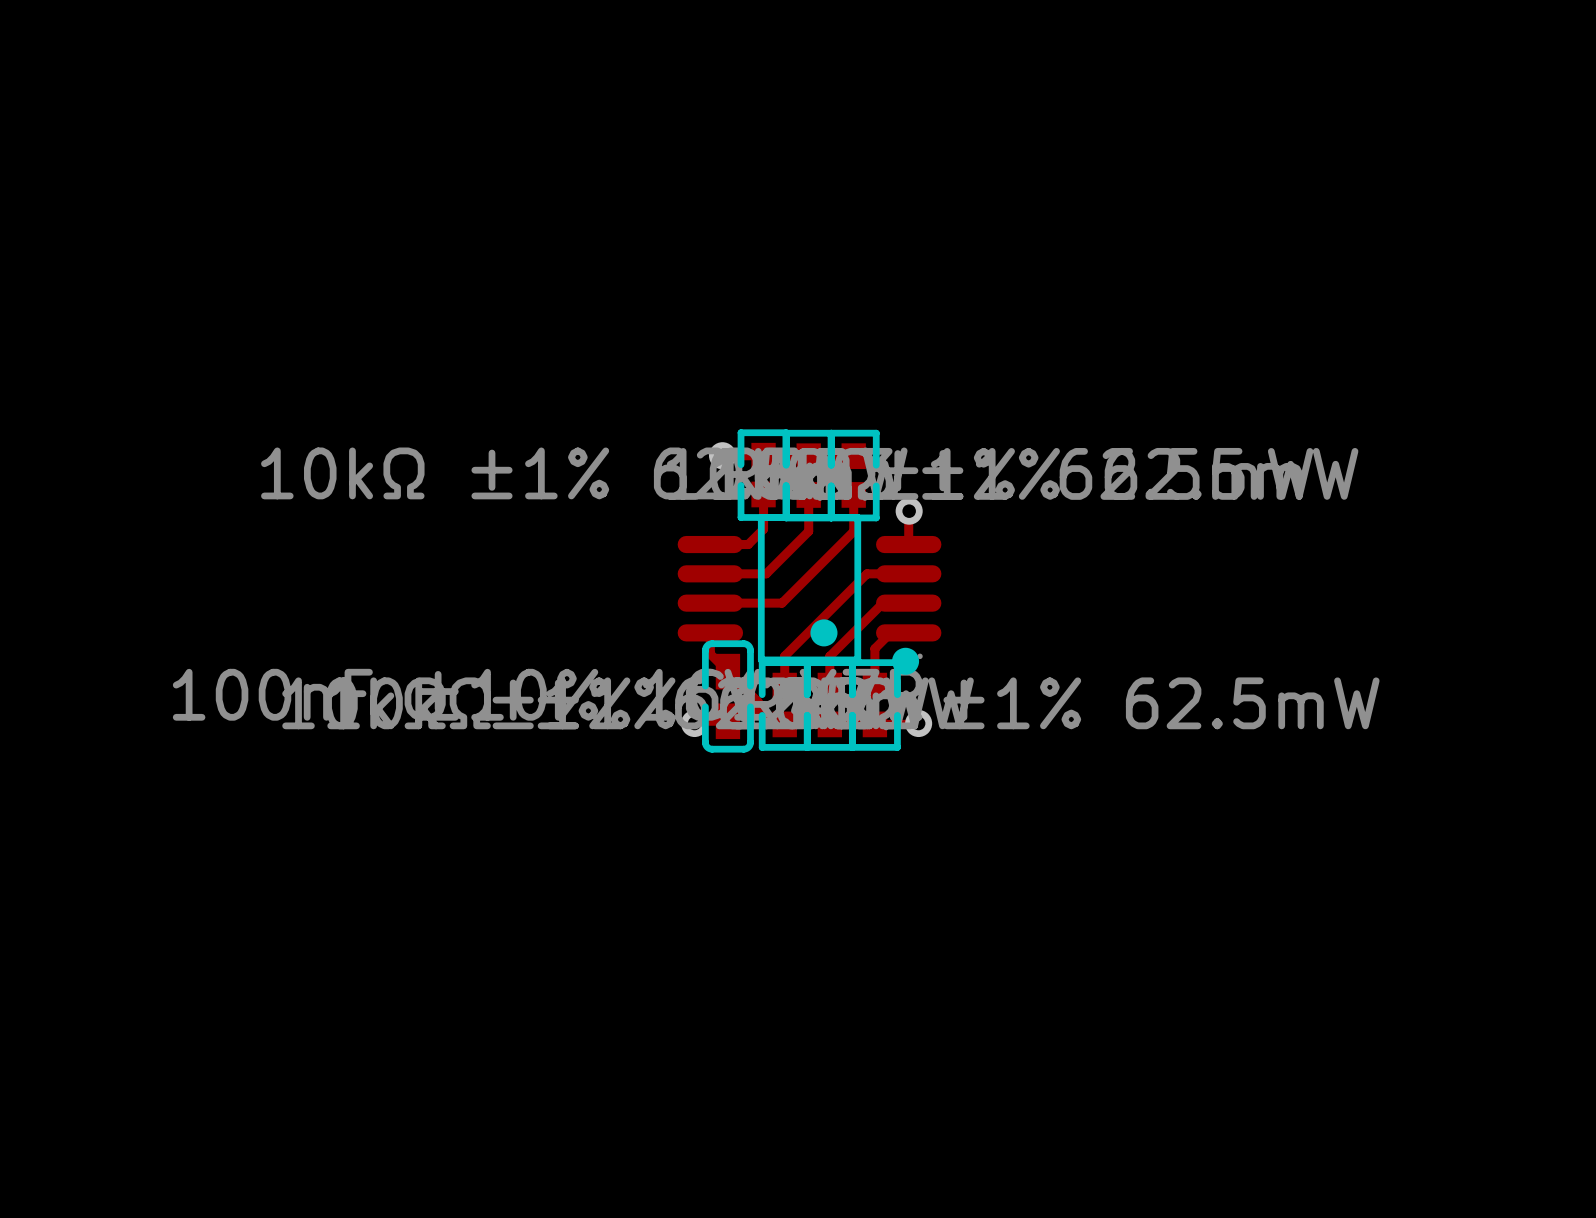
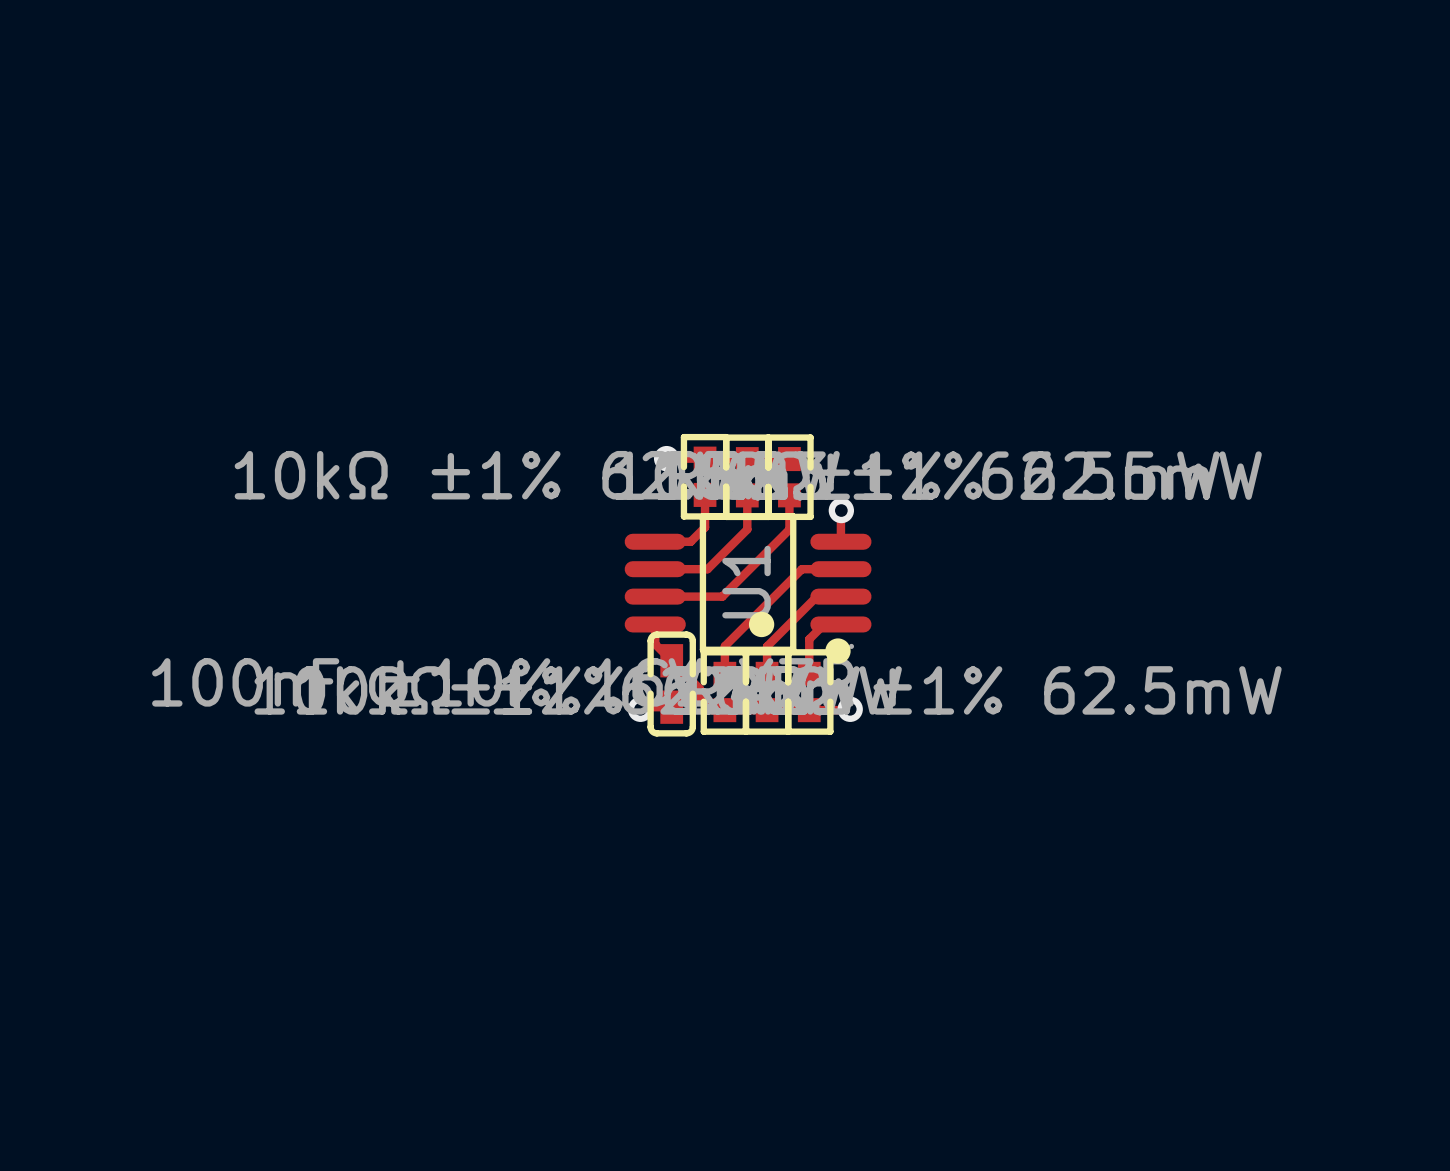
U1 name: none -> U1 (746, 582)

